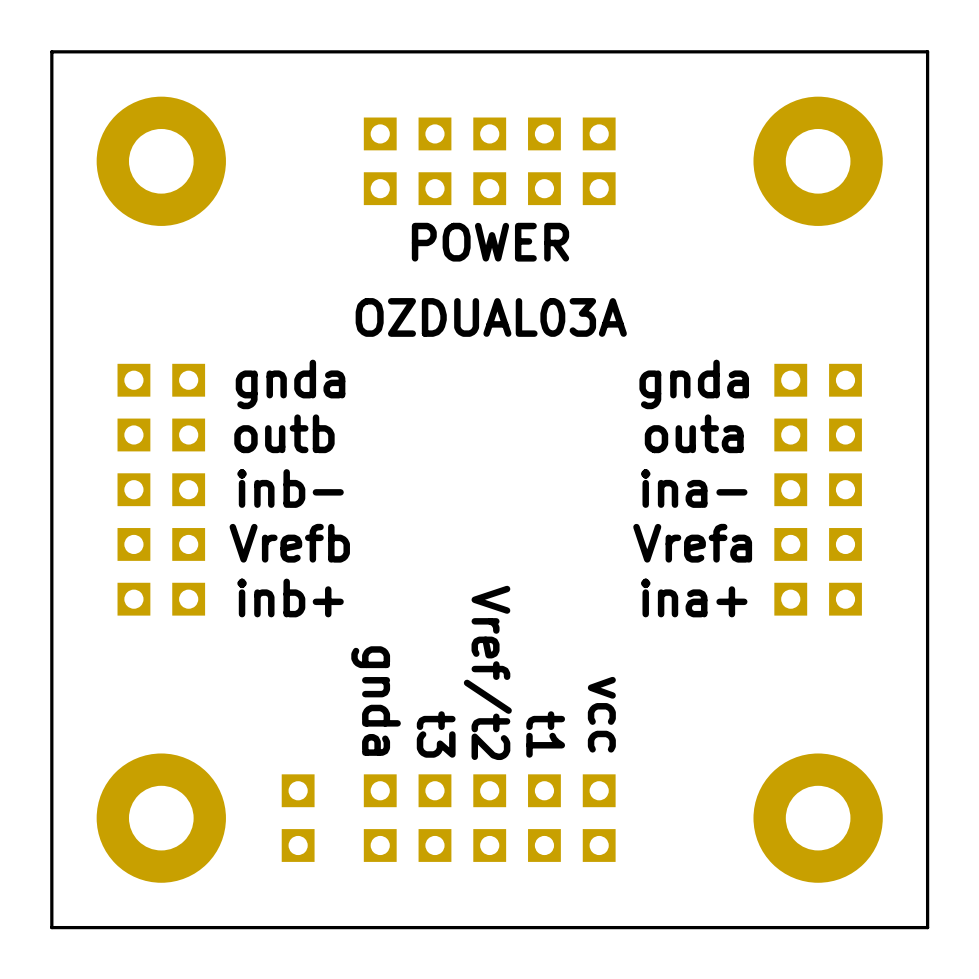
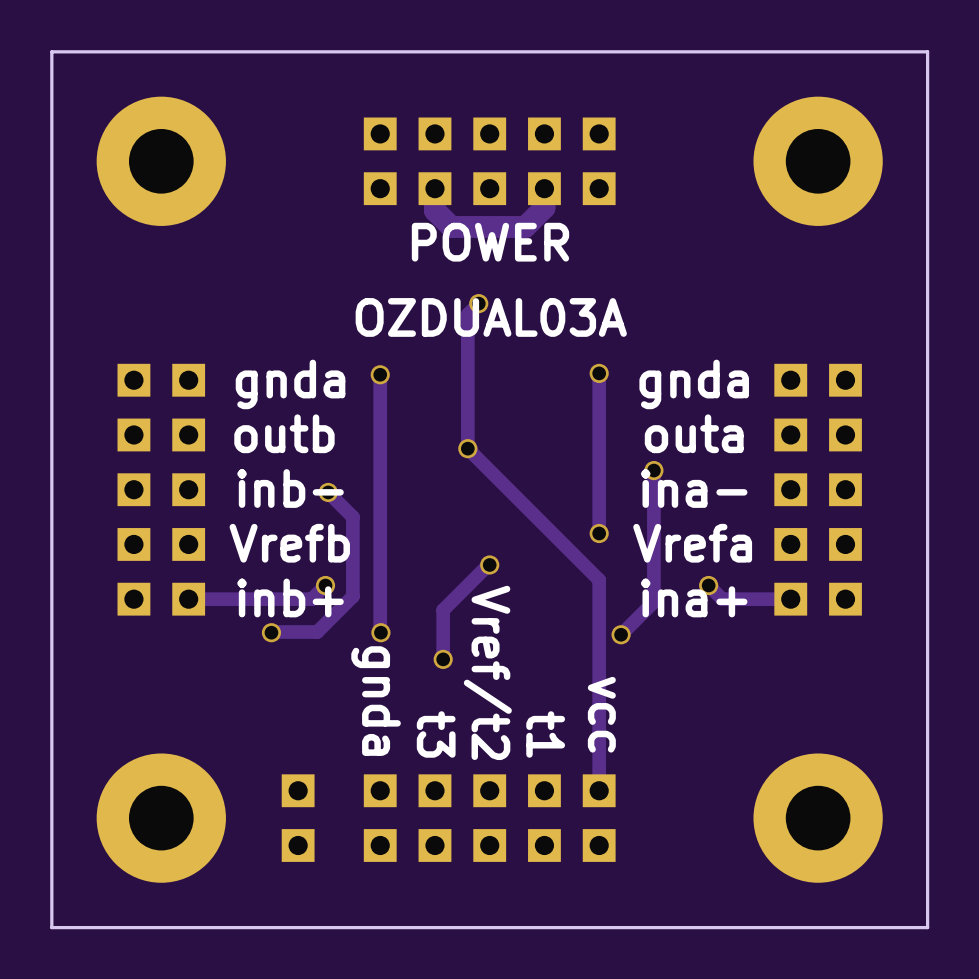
track: none -> (544, 188) (544, 207) (525, 226) (451, 226) (434, 210) (434, 188)
track: none -> (478, 303) (467, 314) (467, 448)
via: none -> (478, 303)
track: none -> (599, 372) (599, 533)
via: none -> (599, 373)
track: none -> (380, 374) (380, 632)
via: none -> (380, 374)
track: none -> (467, 448) (599, 580) (599, 790)
via: none -> (467, 448)
track: none -> (653, 470) (653, 601) (621, 634)
via: none -> (653, 470)
track: none -> (328, 492) (352, 517) (352, 596) (317, 632) (271, 632)
via: none -> (328, 492)
via: none -> (599, 533)
track: none -> (489, 564) (443, 610) (443, 659)
via: none -> (489, 564)
track: none -> (325, 585) (311, 599) (188, 599)
via: none -> (325, 585)
track: none -> (708, 585) (722, 599) (790, 599)
via: none -> (708, 585)
via: none -> (271, 632)
via: none -> (380, 632)
via: none -> (621, 634)
via: none -> (443, 659)

